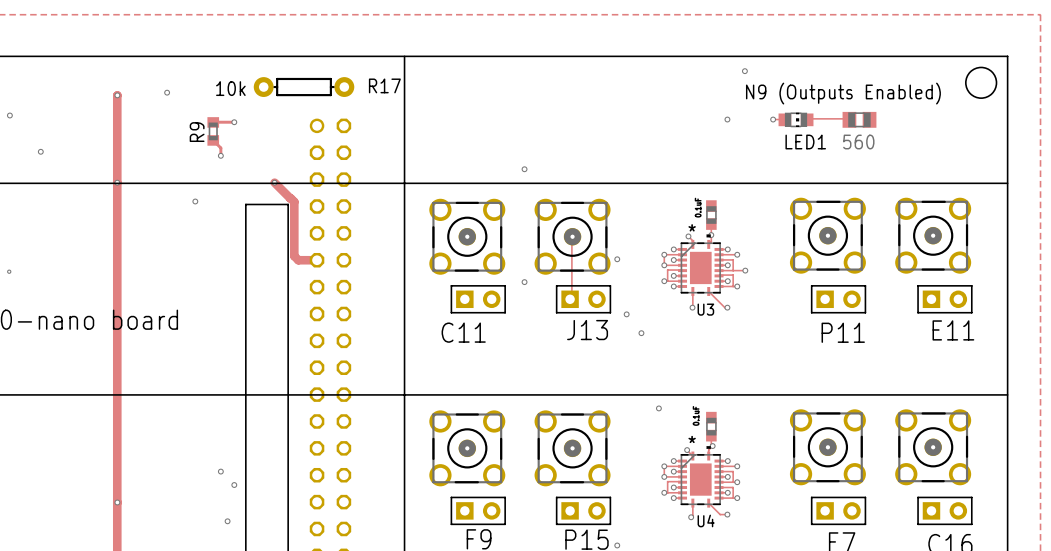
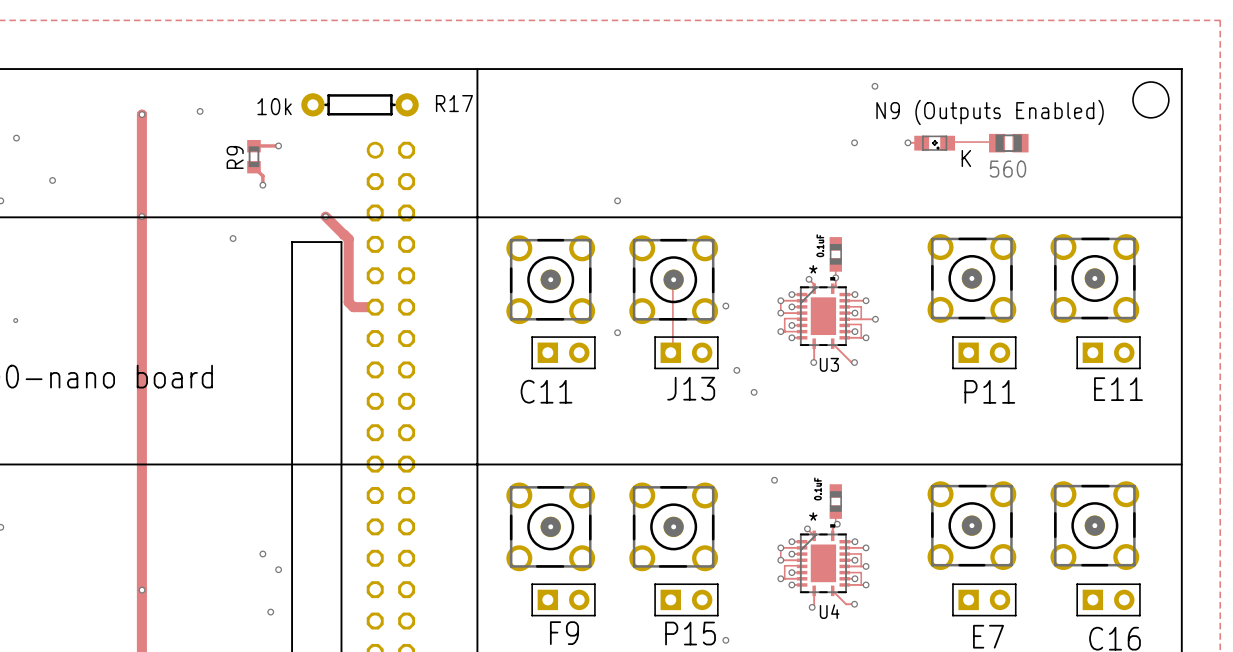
LED1: (796, 119) -> none
part: none -> (934, 143)
text: none -> K (966, 158)

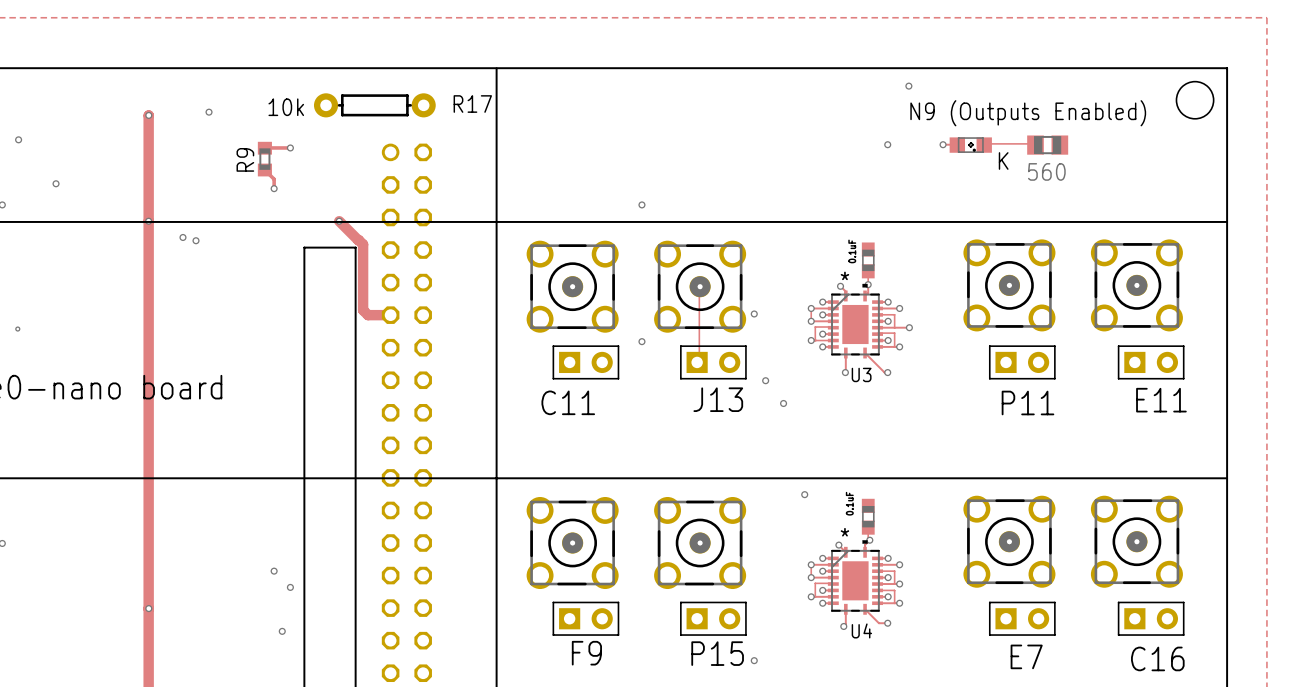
via: none -> (182, 237)
via: none -> (196, 240)
via: (233, 238) -> none

